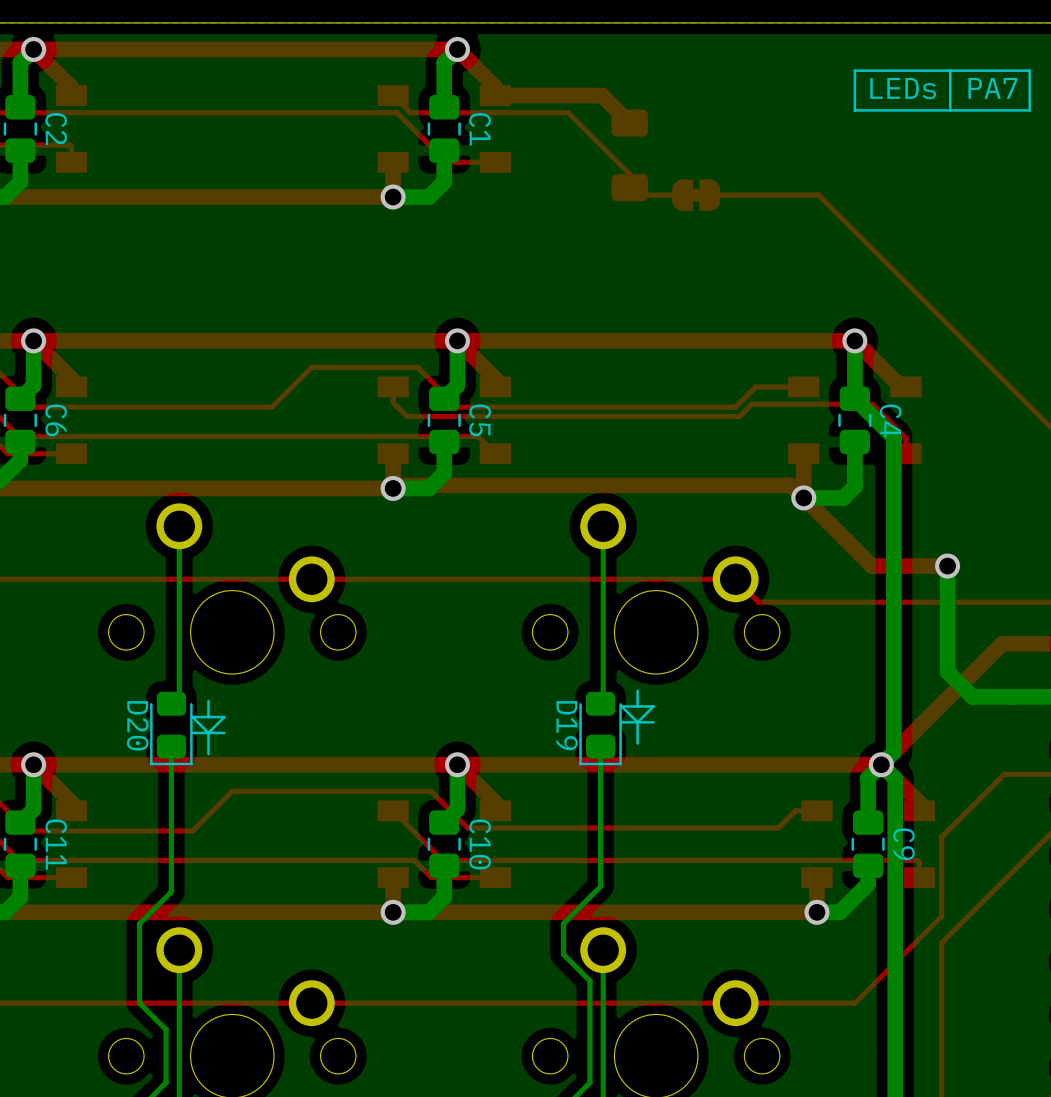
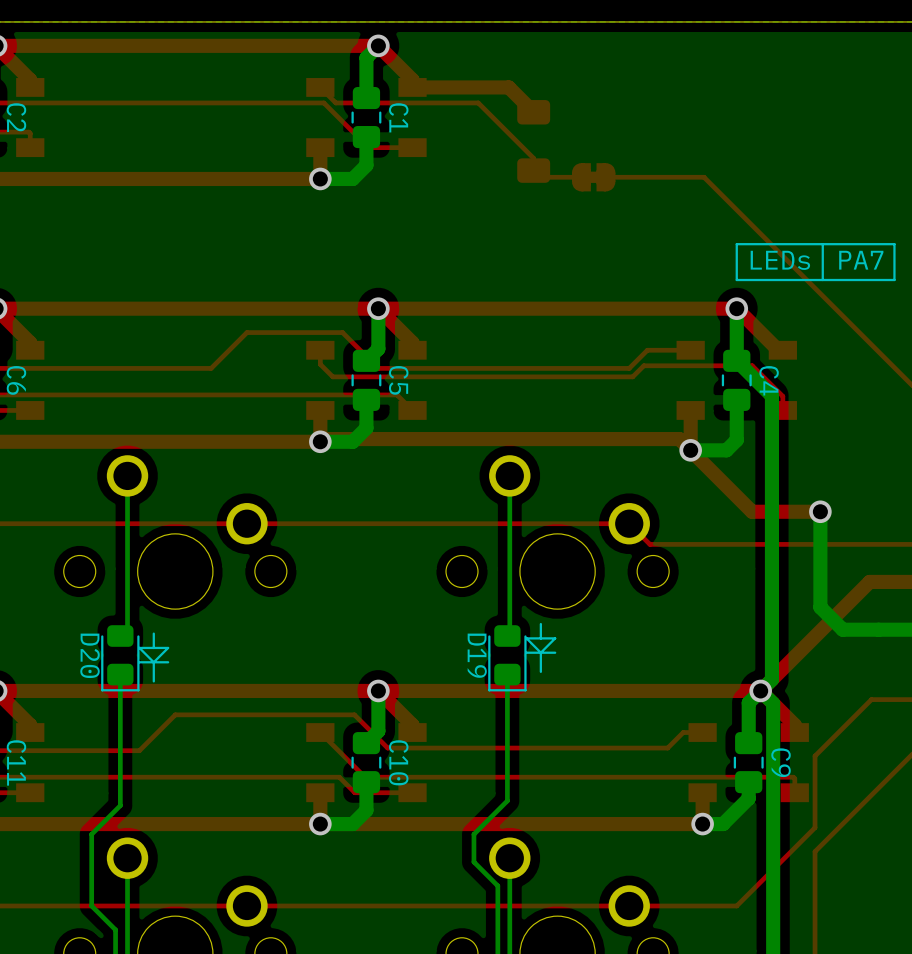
line: (950, 70) (950, 110) -> (822, 244) (822, 280)
line: (1029, 70) (854, 70) (854, 110) (1029, 110) (1029, 70) -> (894, 244) (736, 244) (736, 280) (894, 280) (894, 244)
text position: LEDs (903, 88) -> LEDs (780, 260)
text position: PA7 (992, 88) -> PA7 (861, 260)

